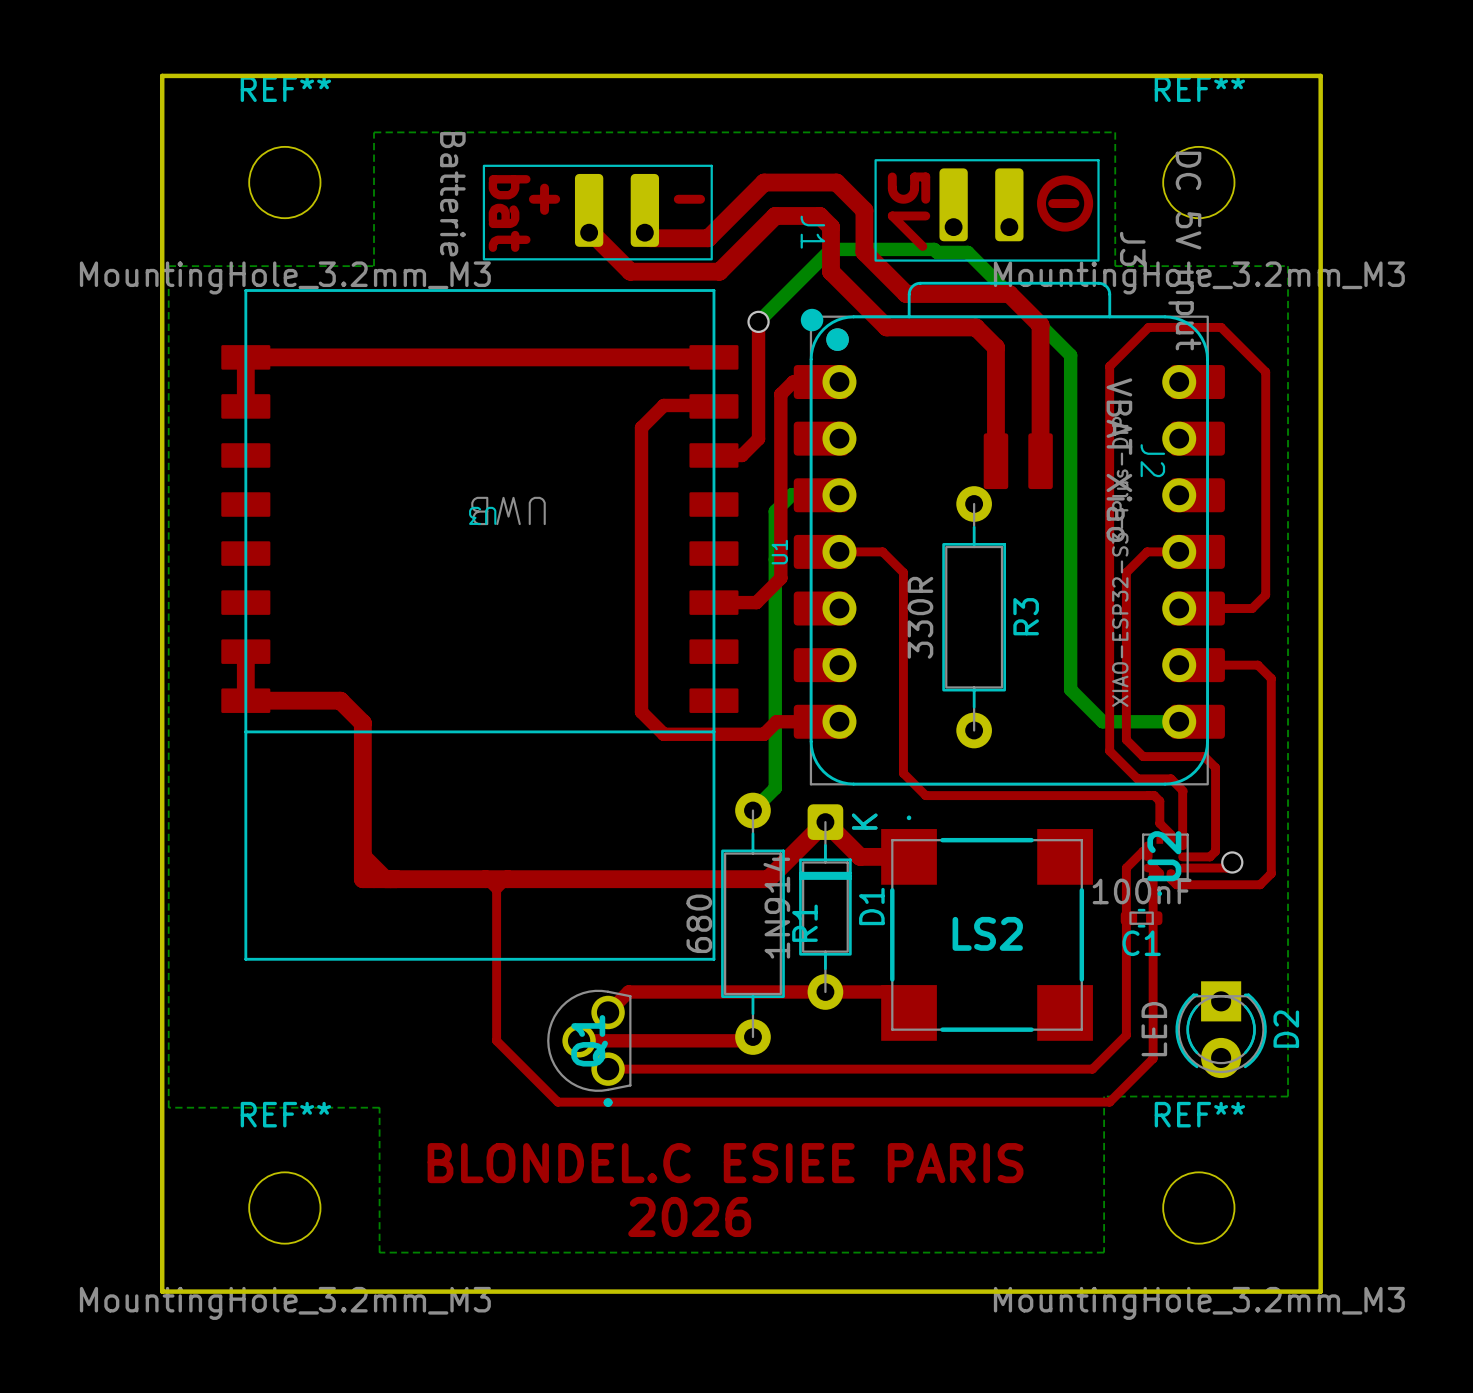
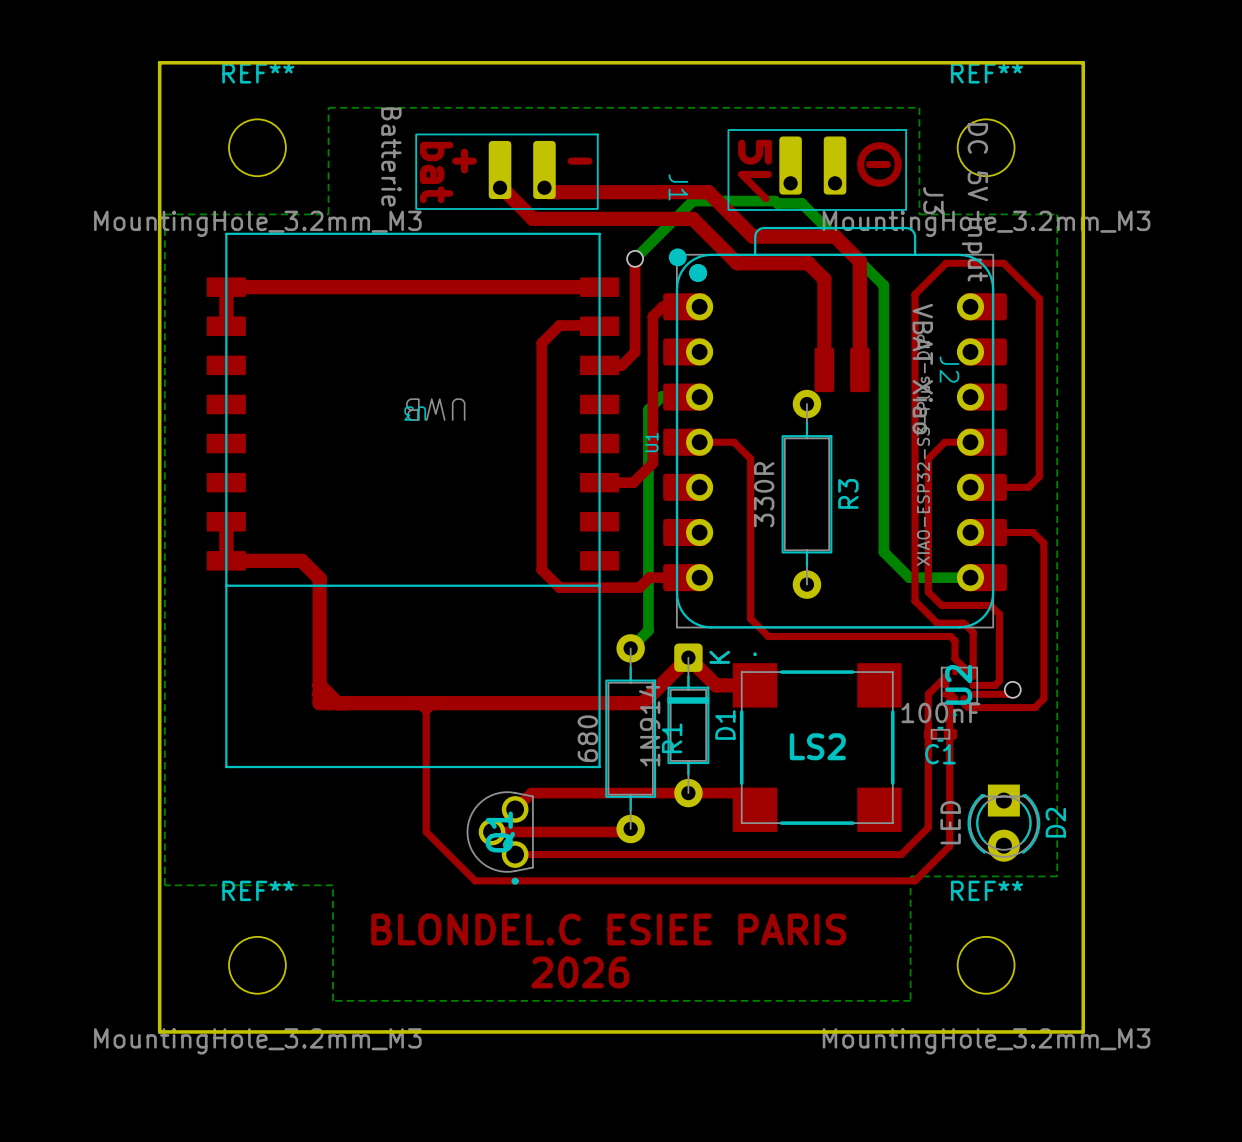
top track: (708, 238) (764, 182) (836, 182) (864, 210) (864, 252) -> (595, 192) (708, 192) (719, 203)
top track: (719, 271) (775, 215) (819, 215) (831, 227) (831, 271) -> (604, 218) (692, 218)

